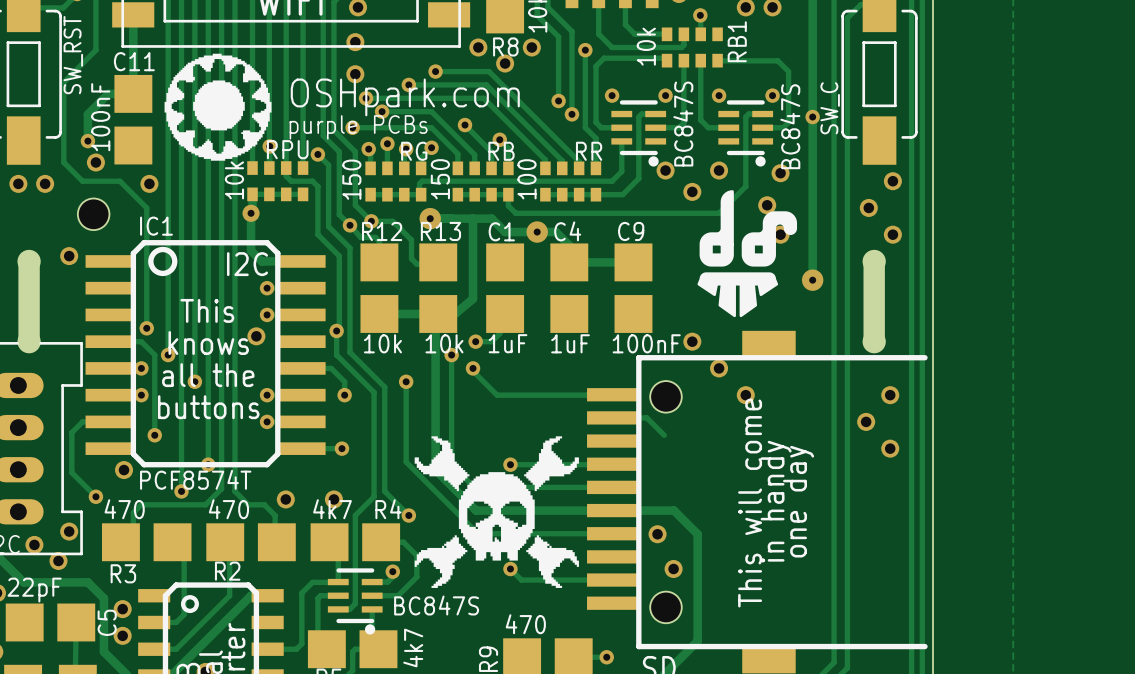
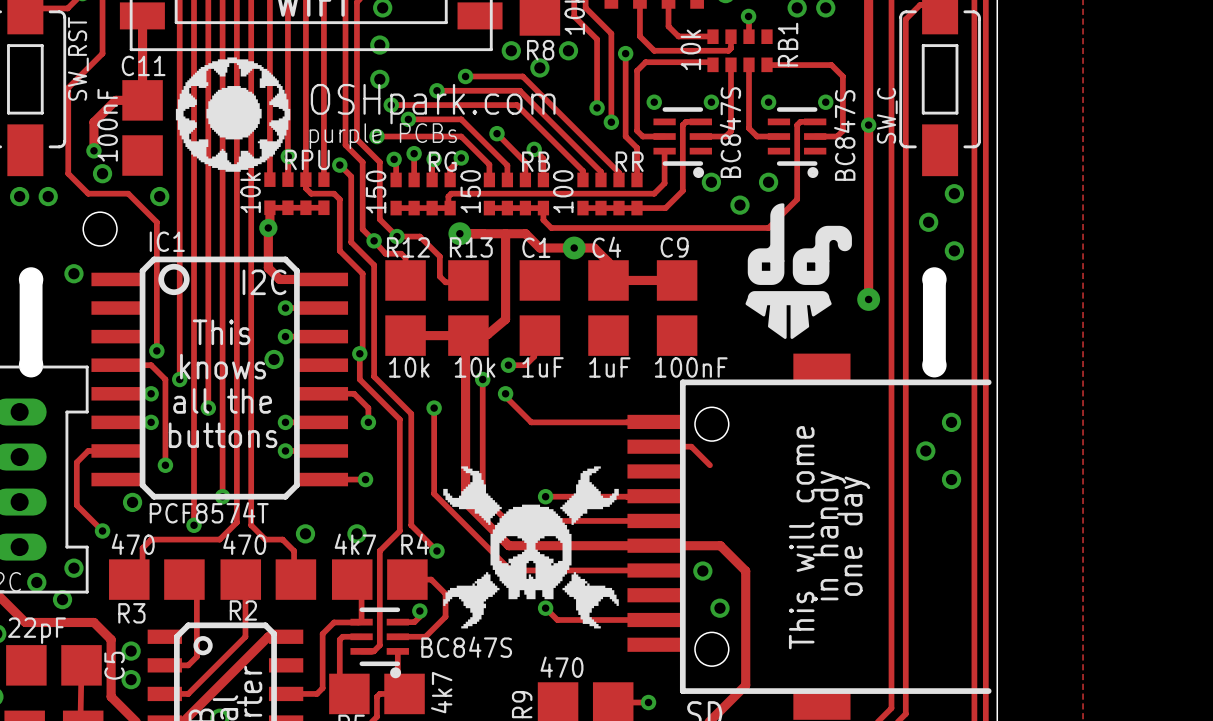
via: (780, 173) -> none
via: (767, 205) -> none
via: (780, 234) -> none
via: (692, 341) -> none
via: (719, 368) -> none
via: (745, 395) -> none

